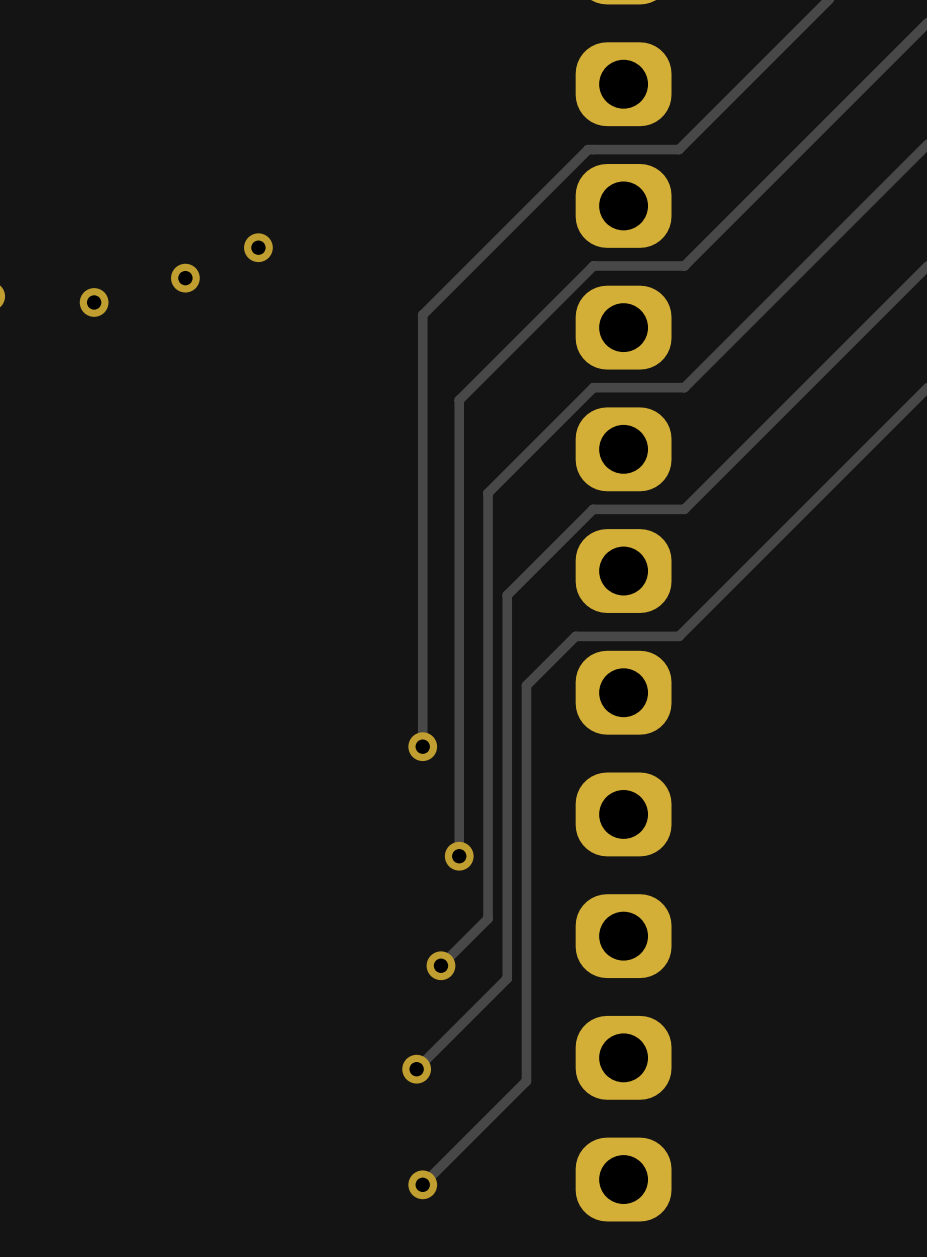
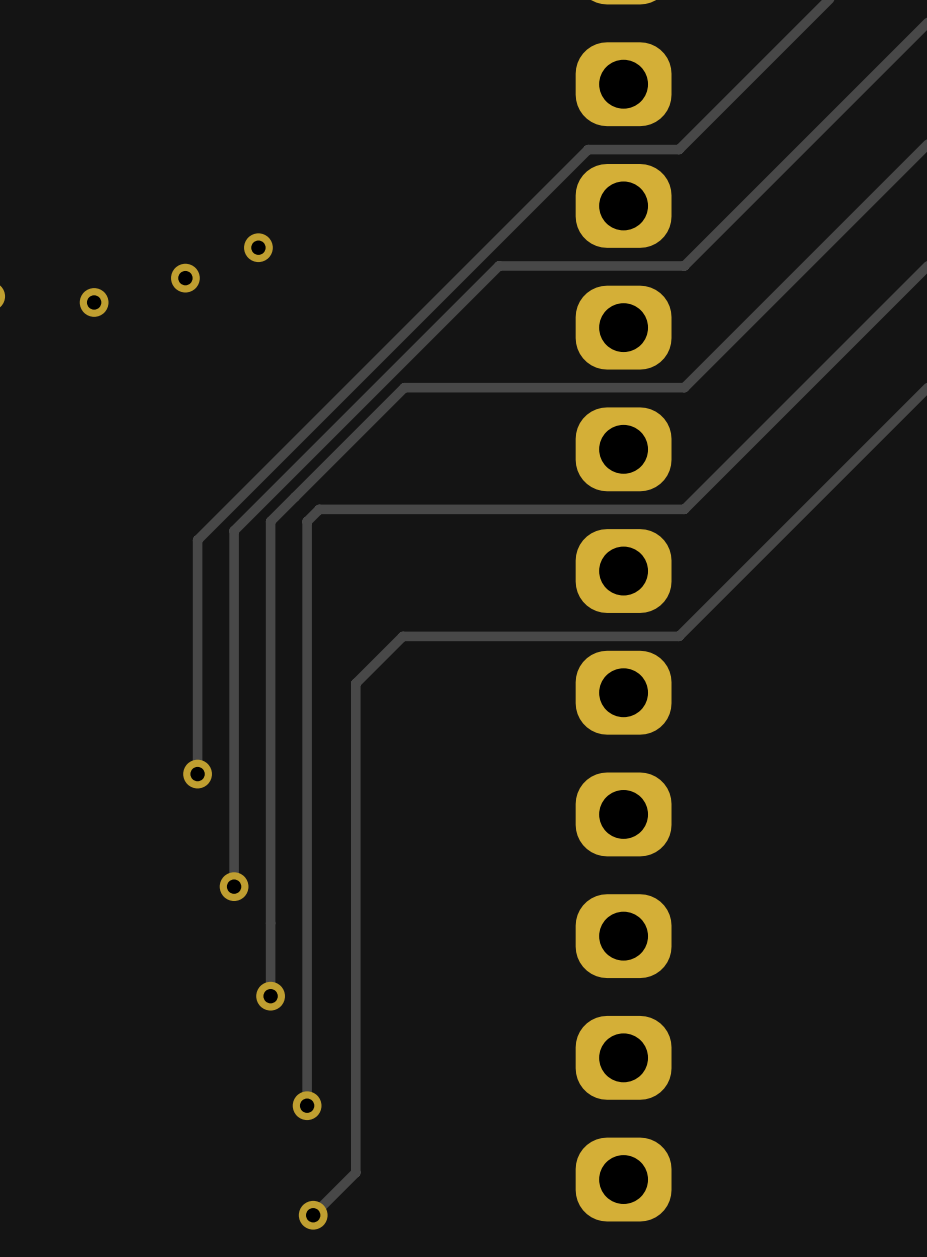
track: (593, 265) (459, 400) (459, 856) -> (593, 265) (498, 265) (234, 530) (234, 886)
track: (422, 314) (422, 746) -> (422, 314) (197, 540) (197, 774)
track: (593, 387) (488, 493) (488, 918) (440, 965) -> (593, 387) (404, 387) (270, 521) (270, 996)
track: (593, 509) (507, 595) (507, 978) (416, 1069) -> (593, 509) (319, 509) (307, 521) (307, 1105)
track: (575, 636) (526, 685) (526, 1081) (422, 1184) -> (575, 636) (402, 636) (355, 683) (355, 1172) (313, 1215)
via: (422, 746) -> none
via: none -> (197, 774)
via: (459, 856) -> none
via: none -> (234, 886)
via: (440, 965) -> none
via: none -> (270, 996)
via: (416, 1069) -> none
via: none -> (307, 1105)
via: (422, 1184) -> none
via: none -> (313, 1215)

